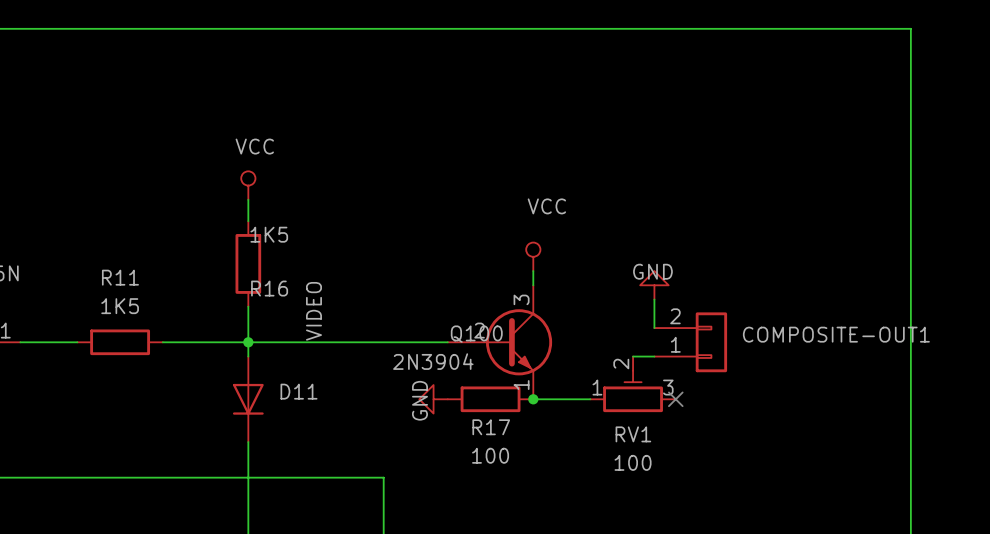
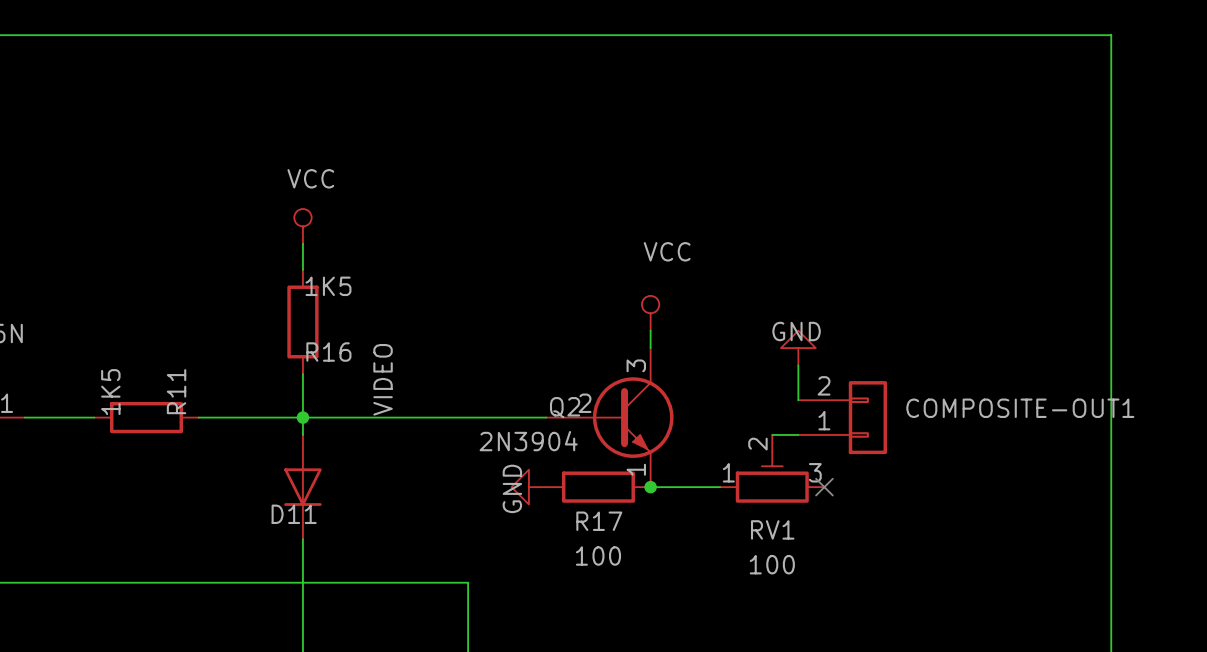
R11 name rotation: 0° (120, 277) -> 90° counterclockwise (176, 391)
R11 name position: R11 (120, 277) -> R11 (176, 391)
R11 value rotation: 0° (120, 306) -> 90° counterclockwise (110, 392)
Q100 name: Q100 (476, 334) -> Q2 (565, 407)
D11 name position: D11 (298, 391) -> D11 (294, 514)

